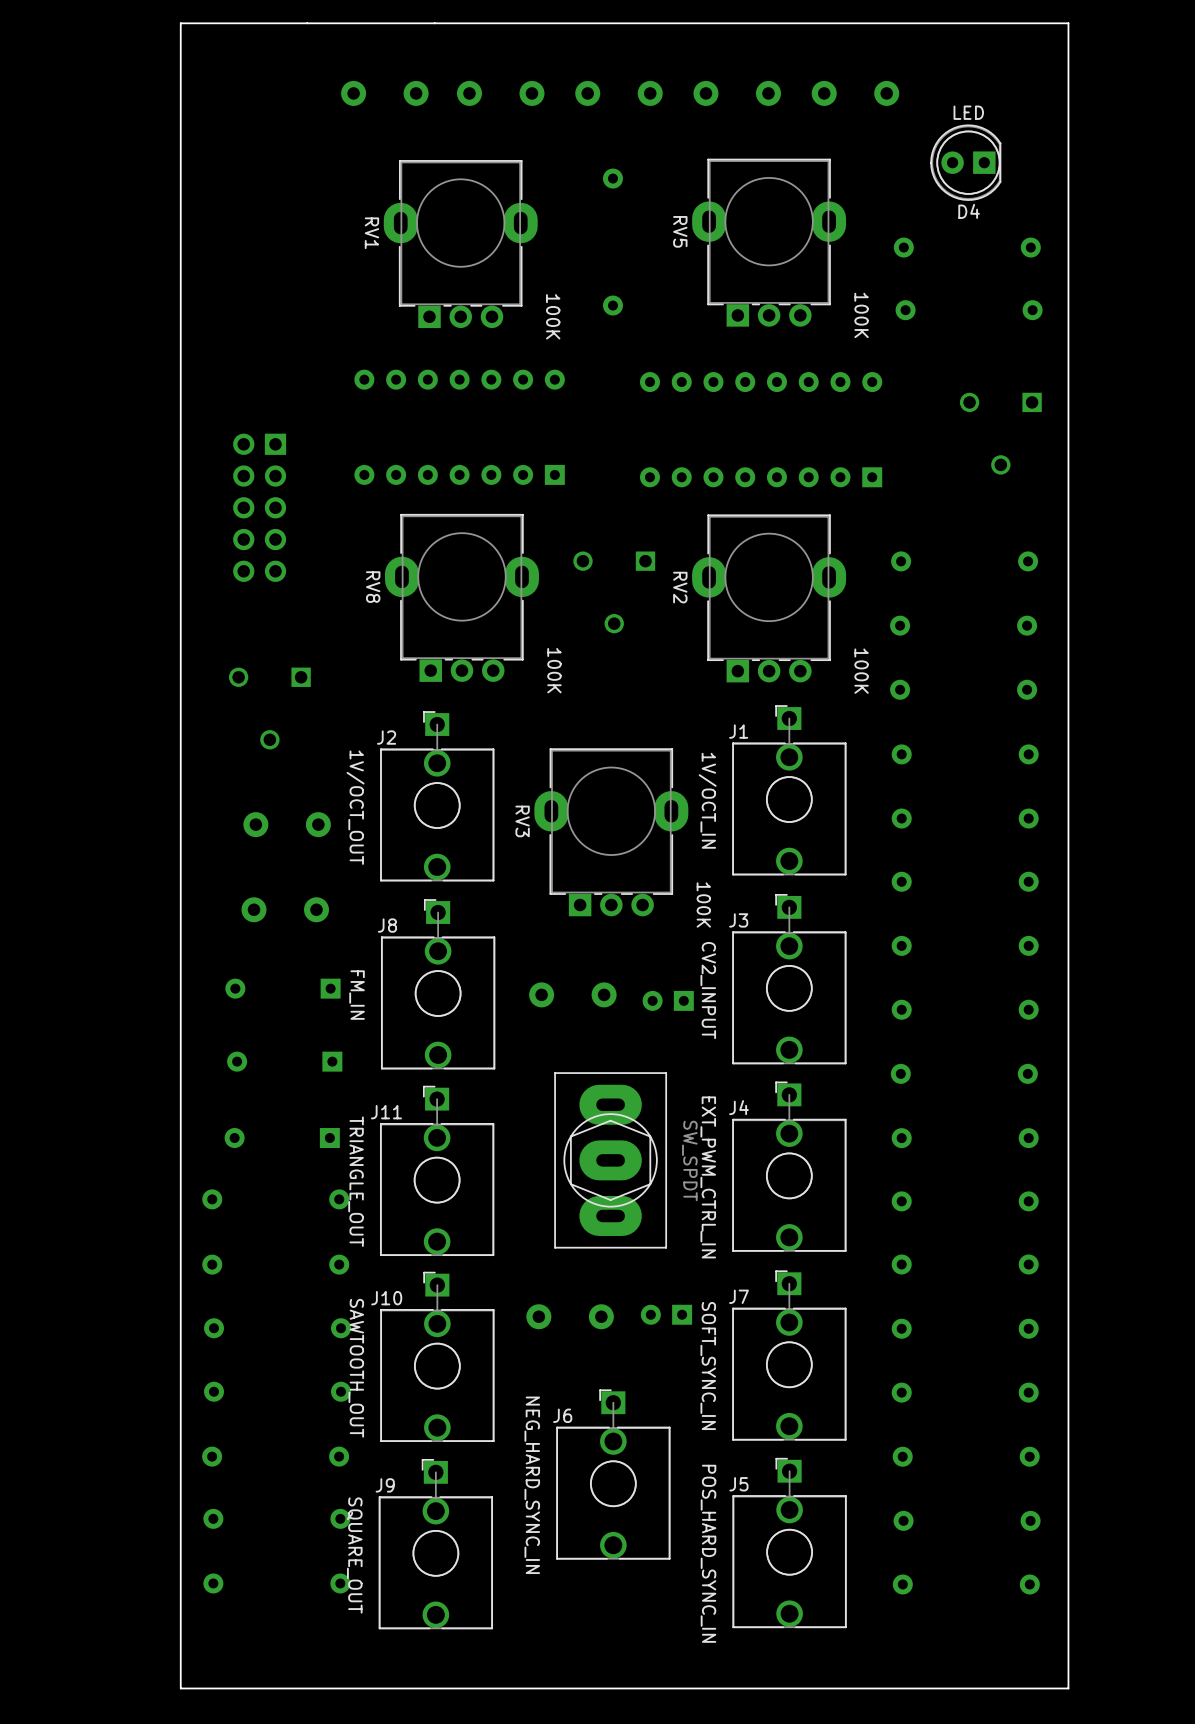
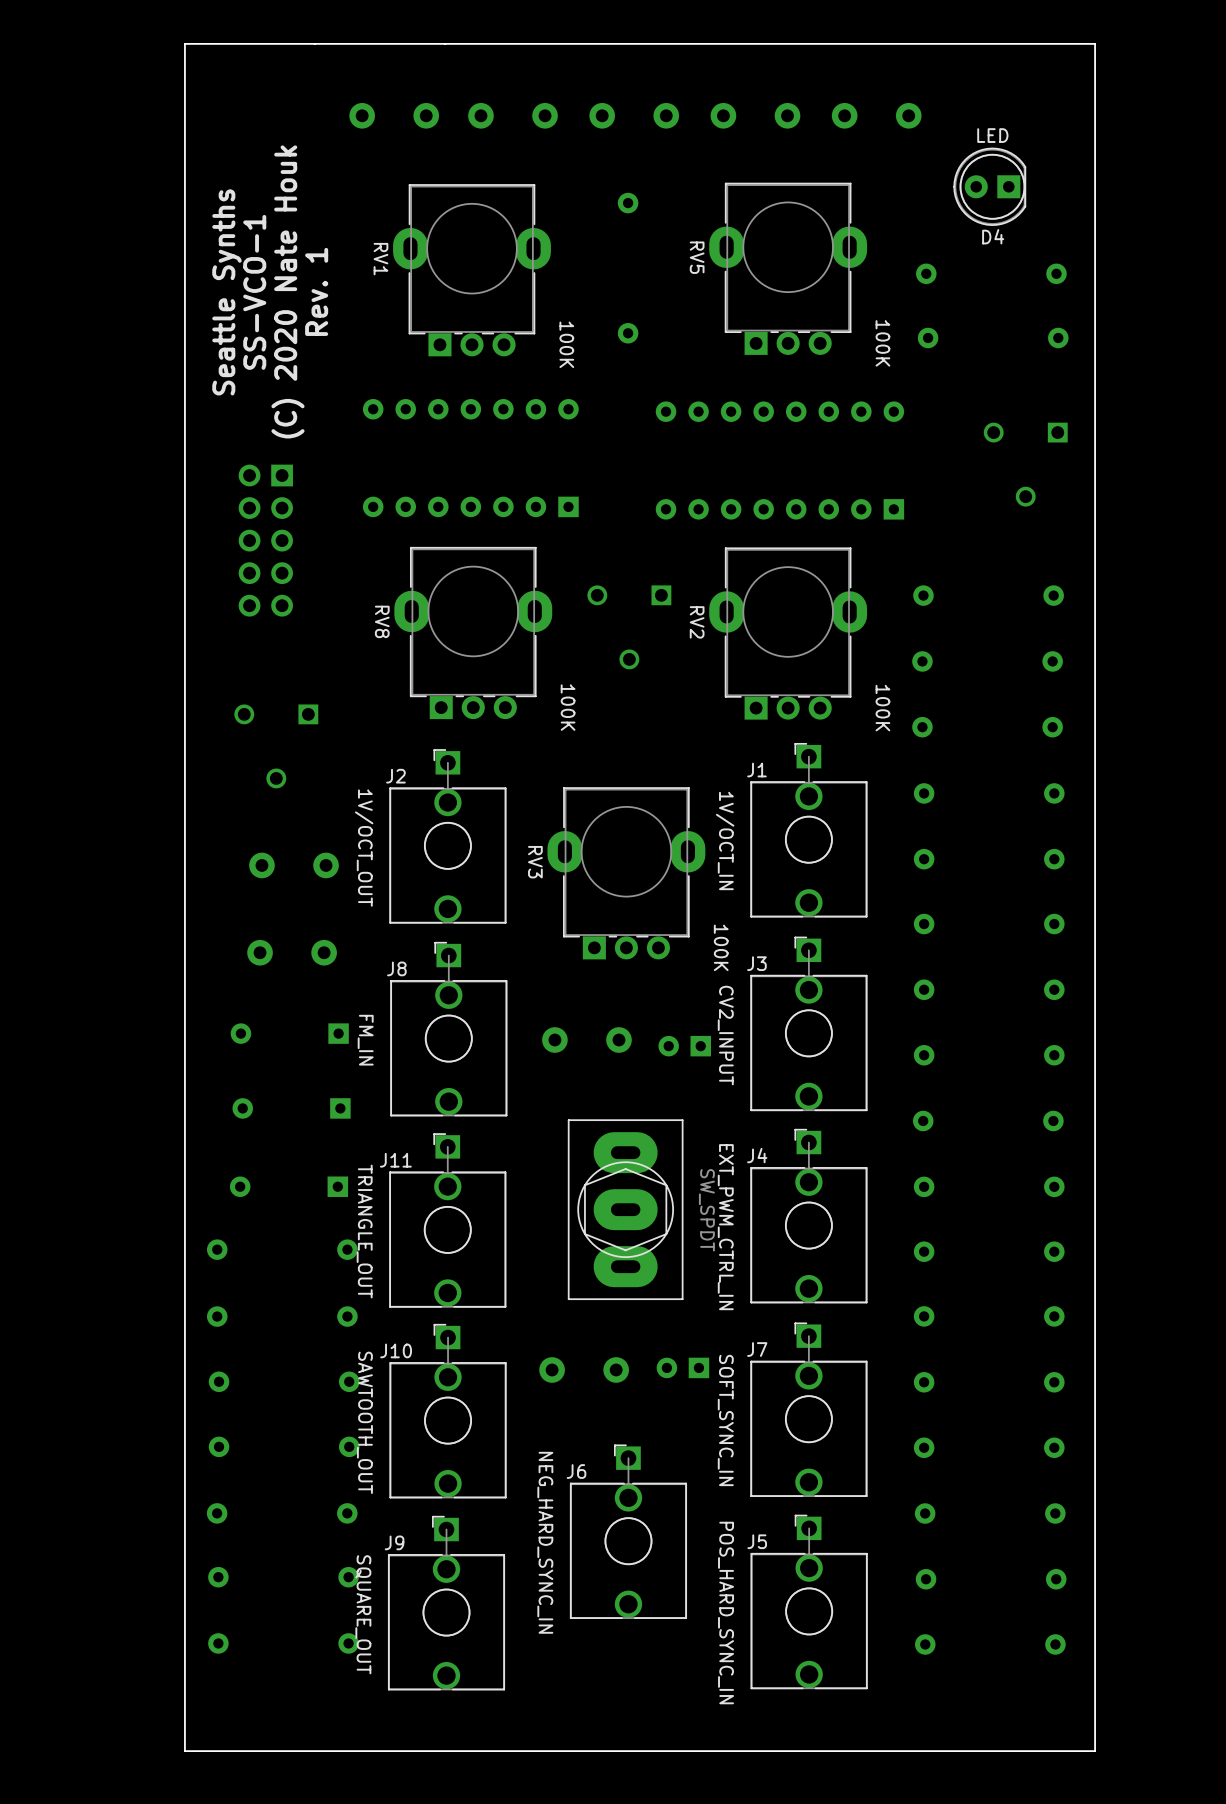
text: none -> Seattle Synths (227, 292)
text: none -> SS-VCO-1 (254, 292)
text: none -> (C) 2020 Nate Houk (287, 291)
text: none -> Rev. 1 (316, 291)

